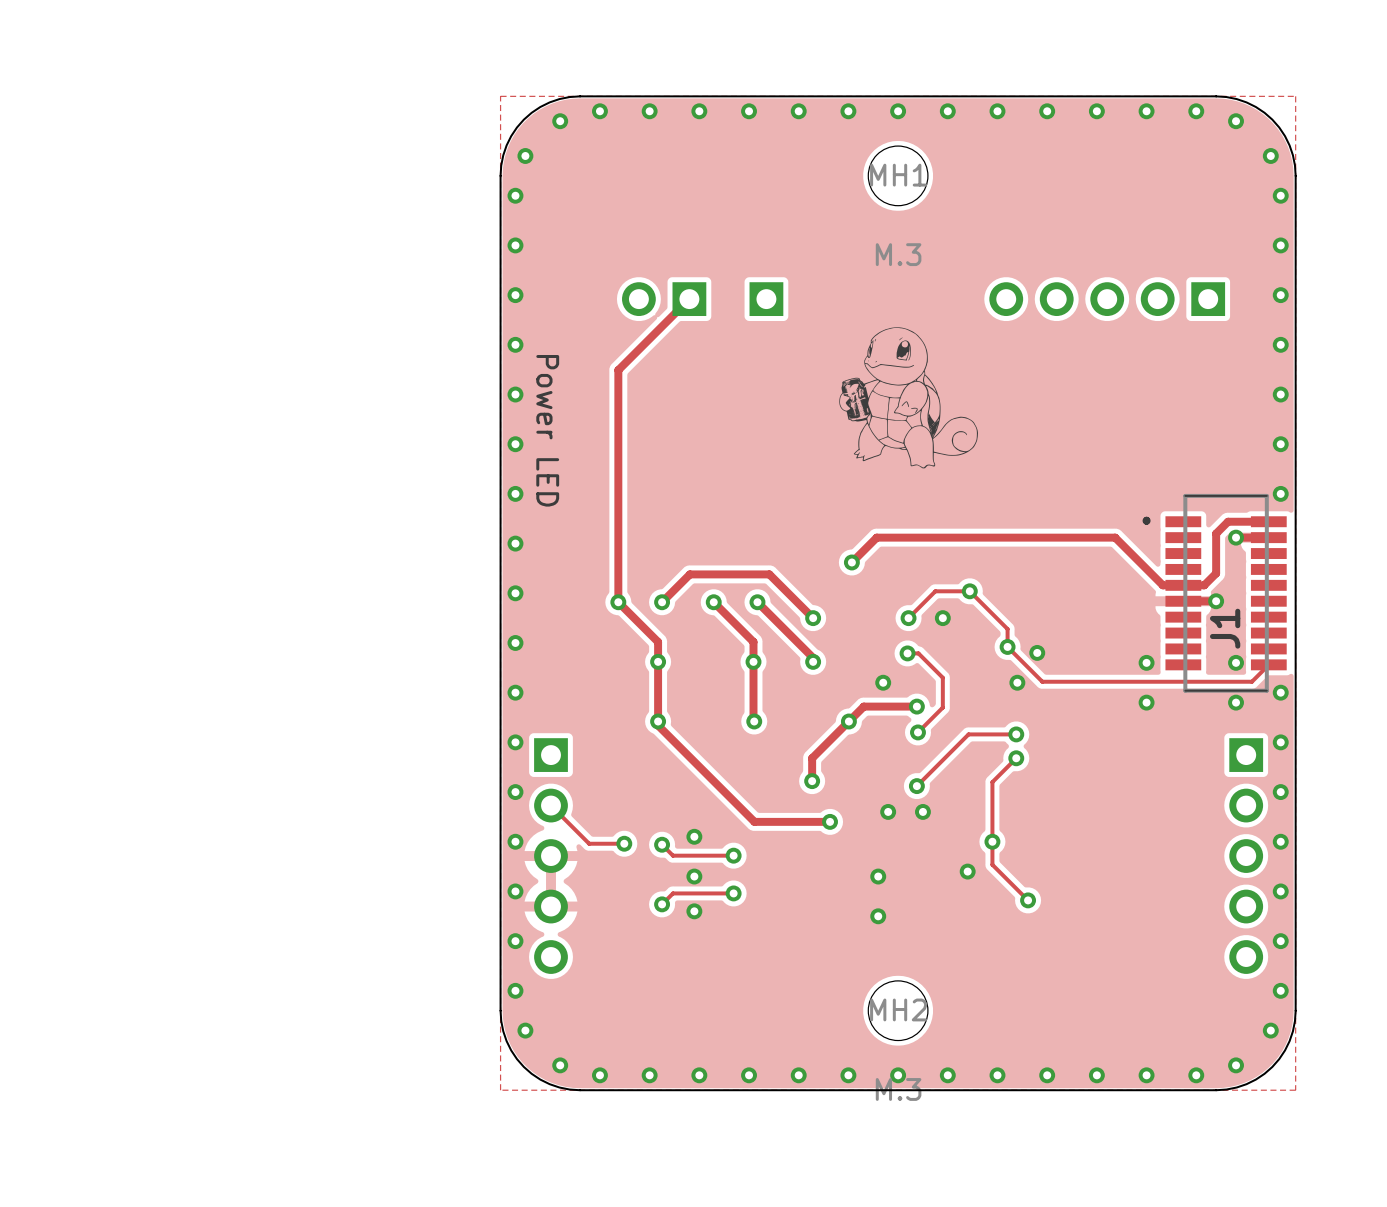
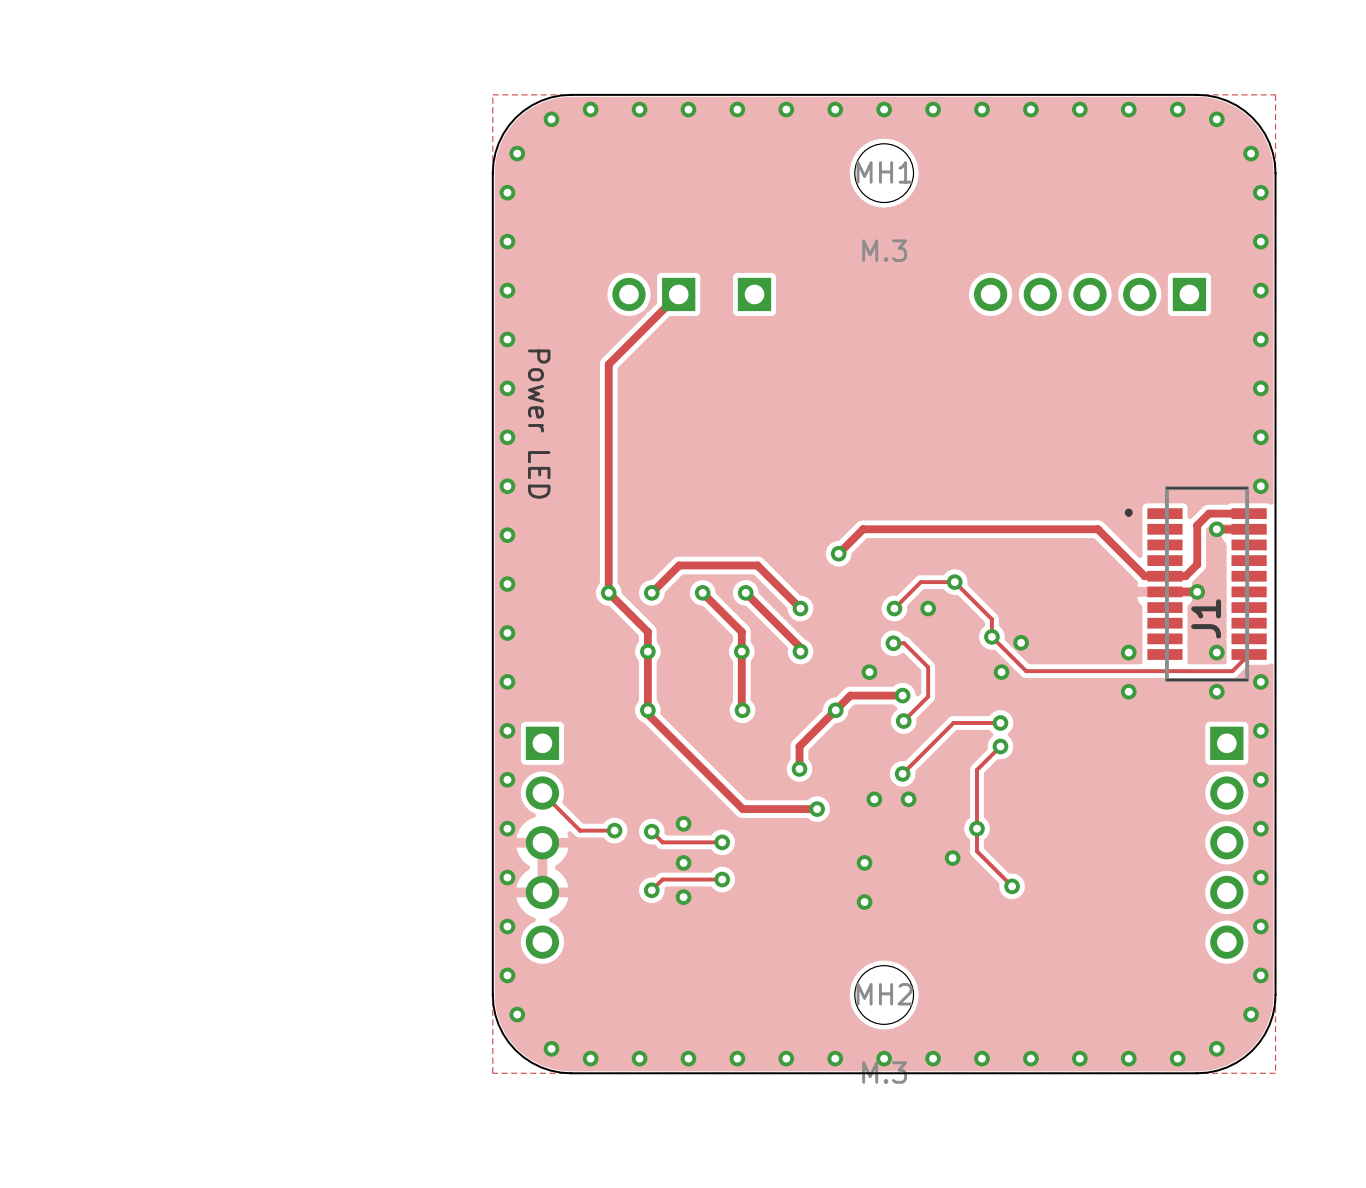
drawing: [839, 327, 978, 469] -> none

